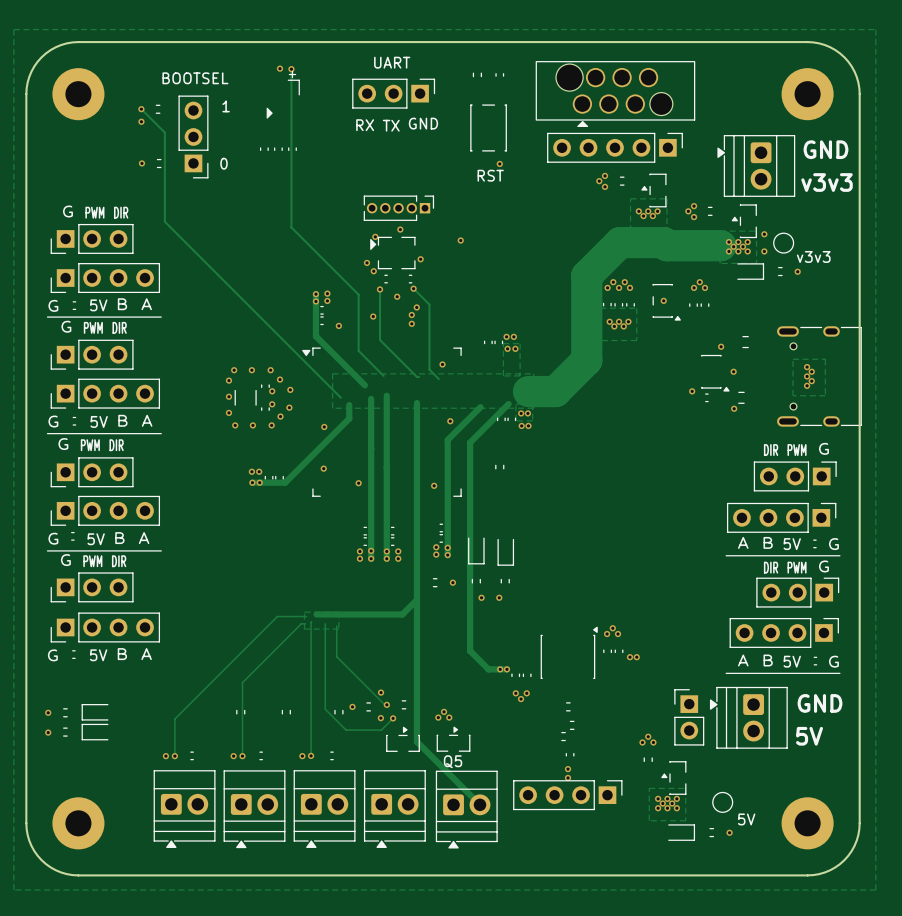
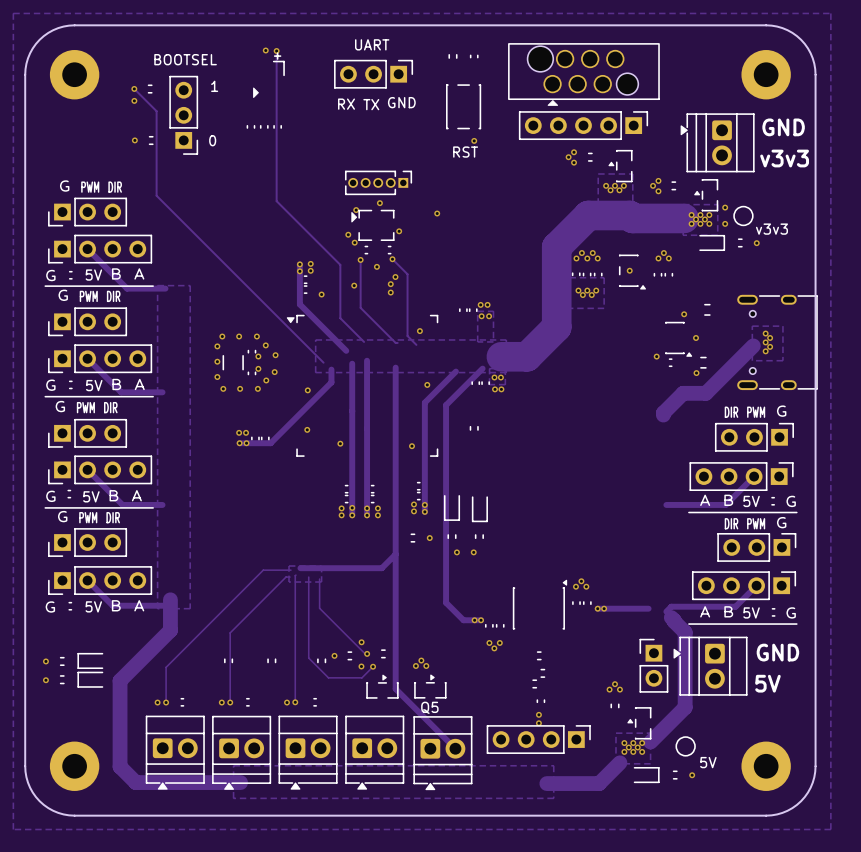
track: none -> (87, 249) (127, 288) (165, 288)
zone outline: none -> (157, 285) (190, 285) (190, 608) (157, 608) (157, 285)
track: none -> (753, 345) (705, 393) (683, 393) (663, 415)
track: none -> (87, 358) (121, 392) (162, 392)
track: none -> (87, 469) (122, 504) (162, 504)
track: none -> (754, 476) (725, 504) (666, 504)
track: none -> (87, 580) (112, 605) (164, 605)
track: none -> (756, 585) (735, 606) (671, 606) (666, 611)
track: none -> (170, 599) (170, 630) (120, 680) (120, 766) (135, 782) (240, 782)
track: none -> (597, 608) (648, 608)
track: none -> (671, 617) (685, 632) (685, 707) (650, 742)
track: none -> (619, 762) (599, 783) (546, 783)
zone outline: none -> (233, 765) (233, 798) (553, 798) (553, 765) (233, 765)

